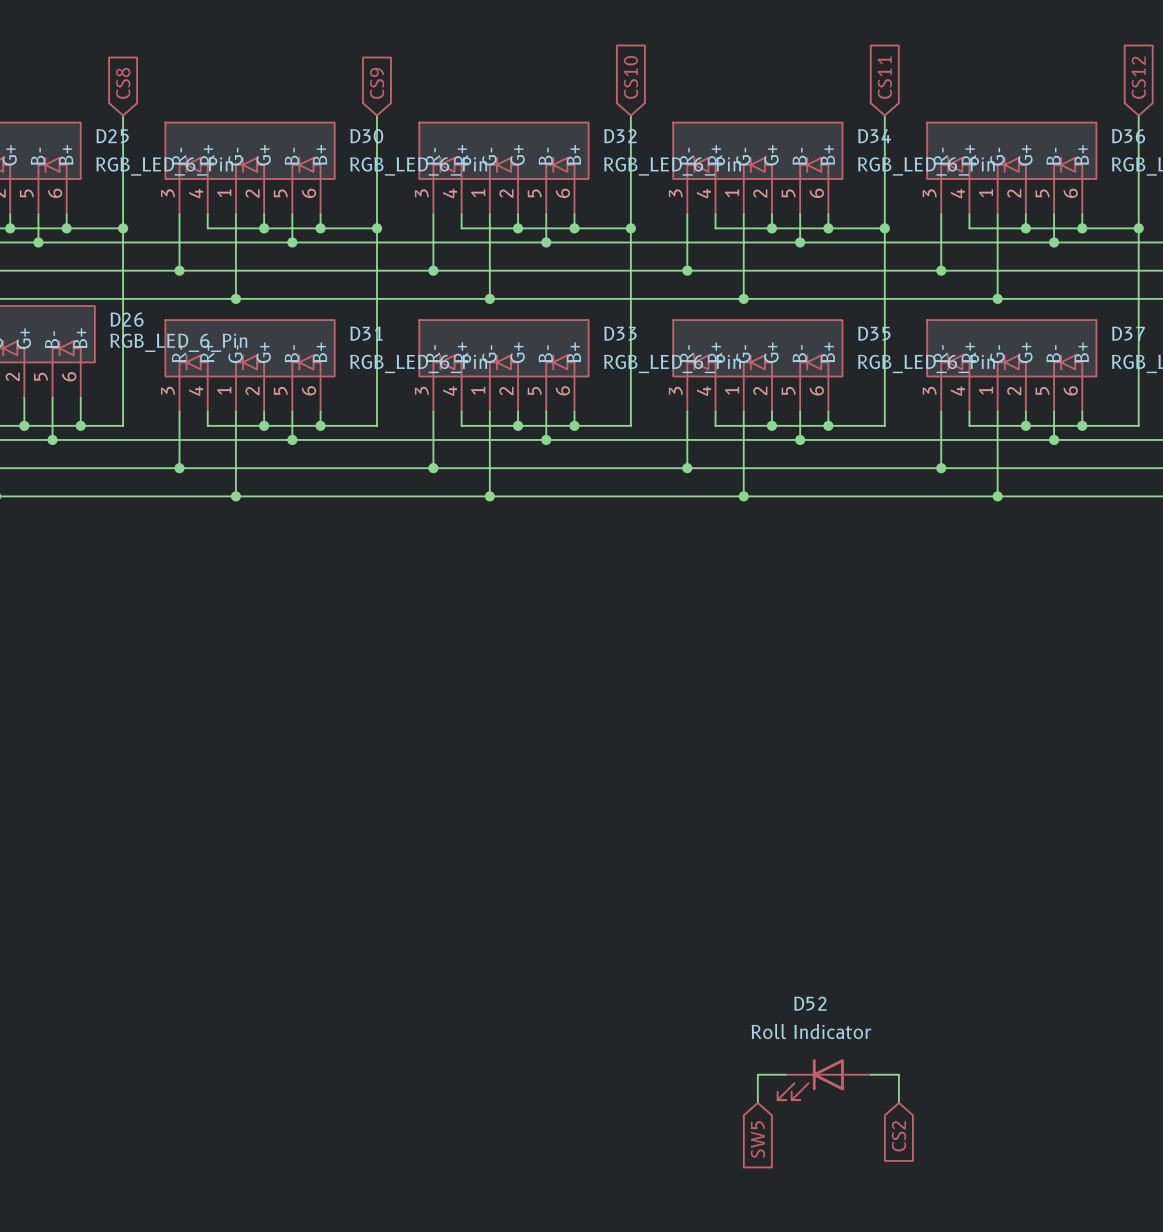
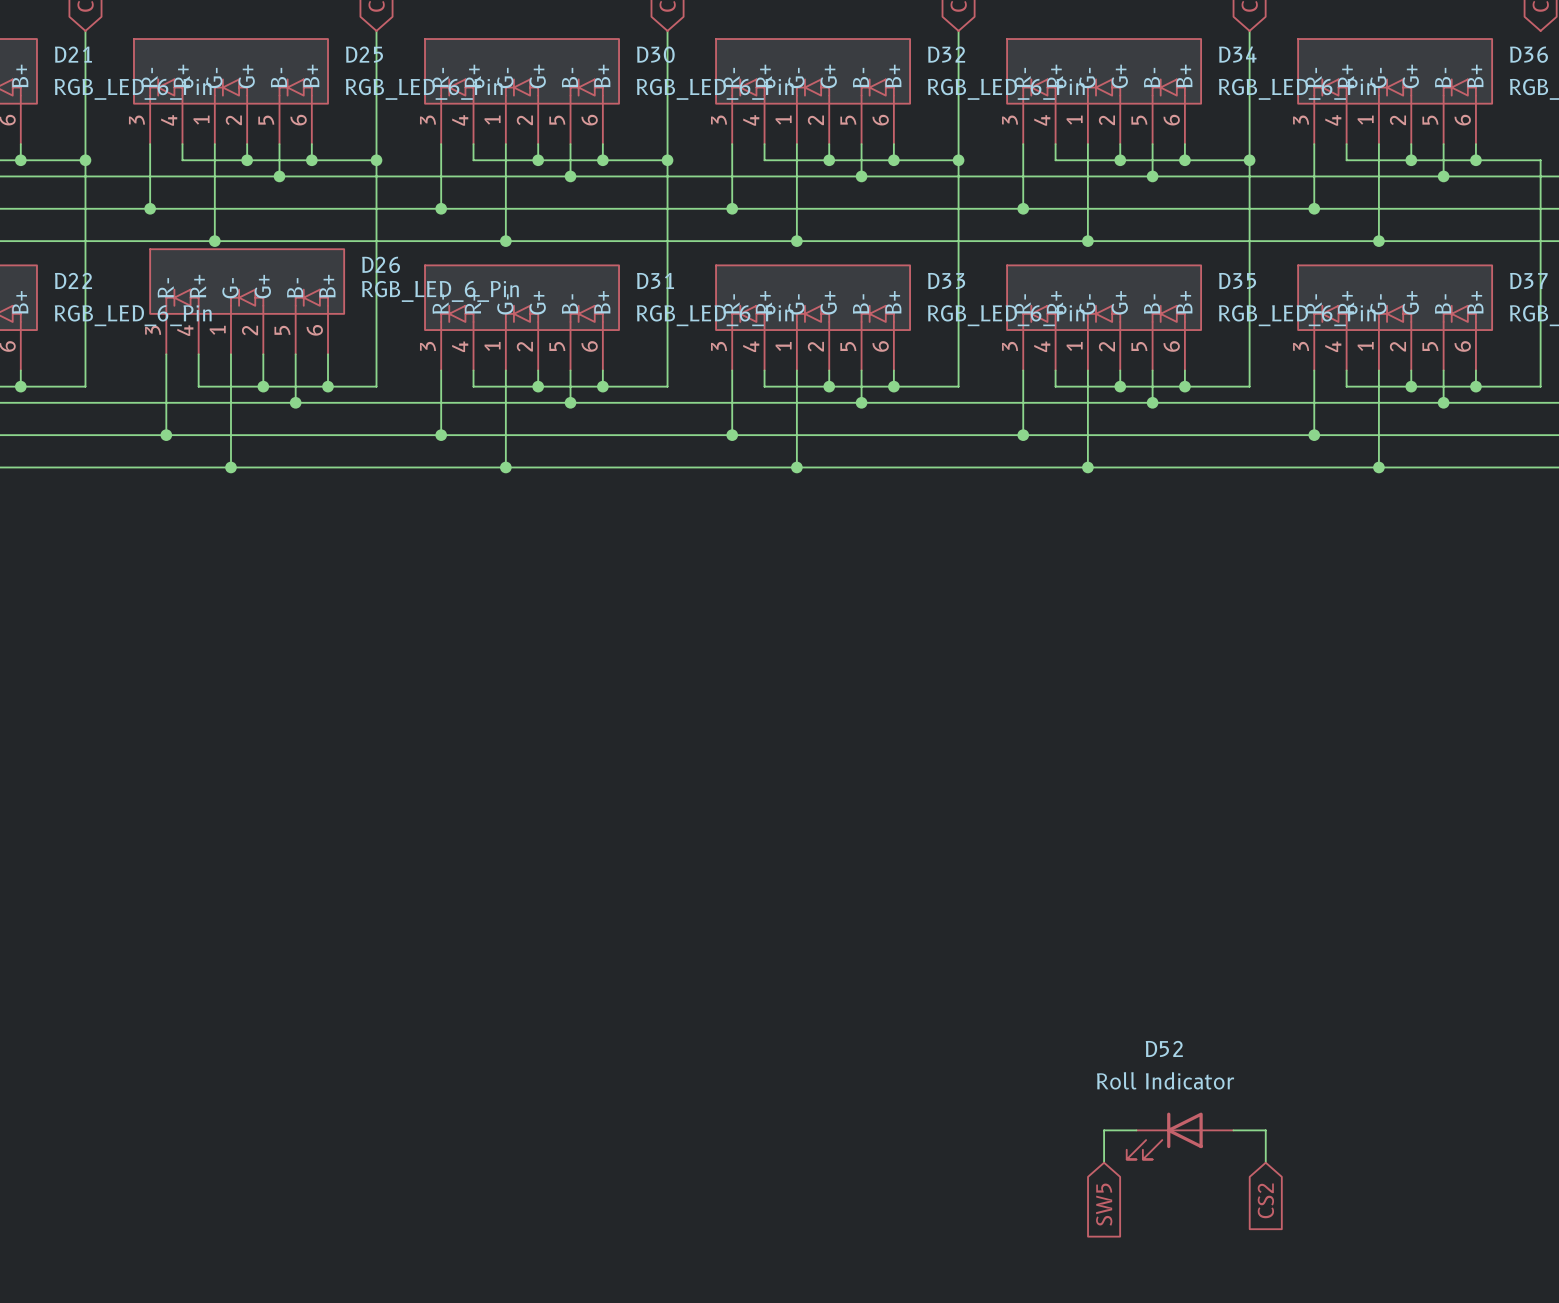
wire: (1138, 115) (1138, 228) -> none
junction: (1138, 228) -> none

